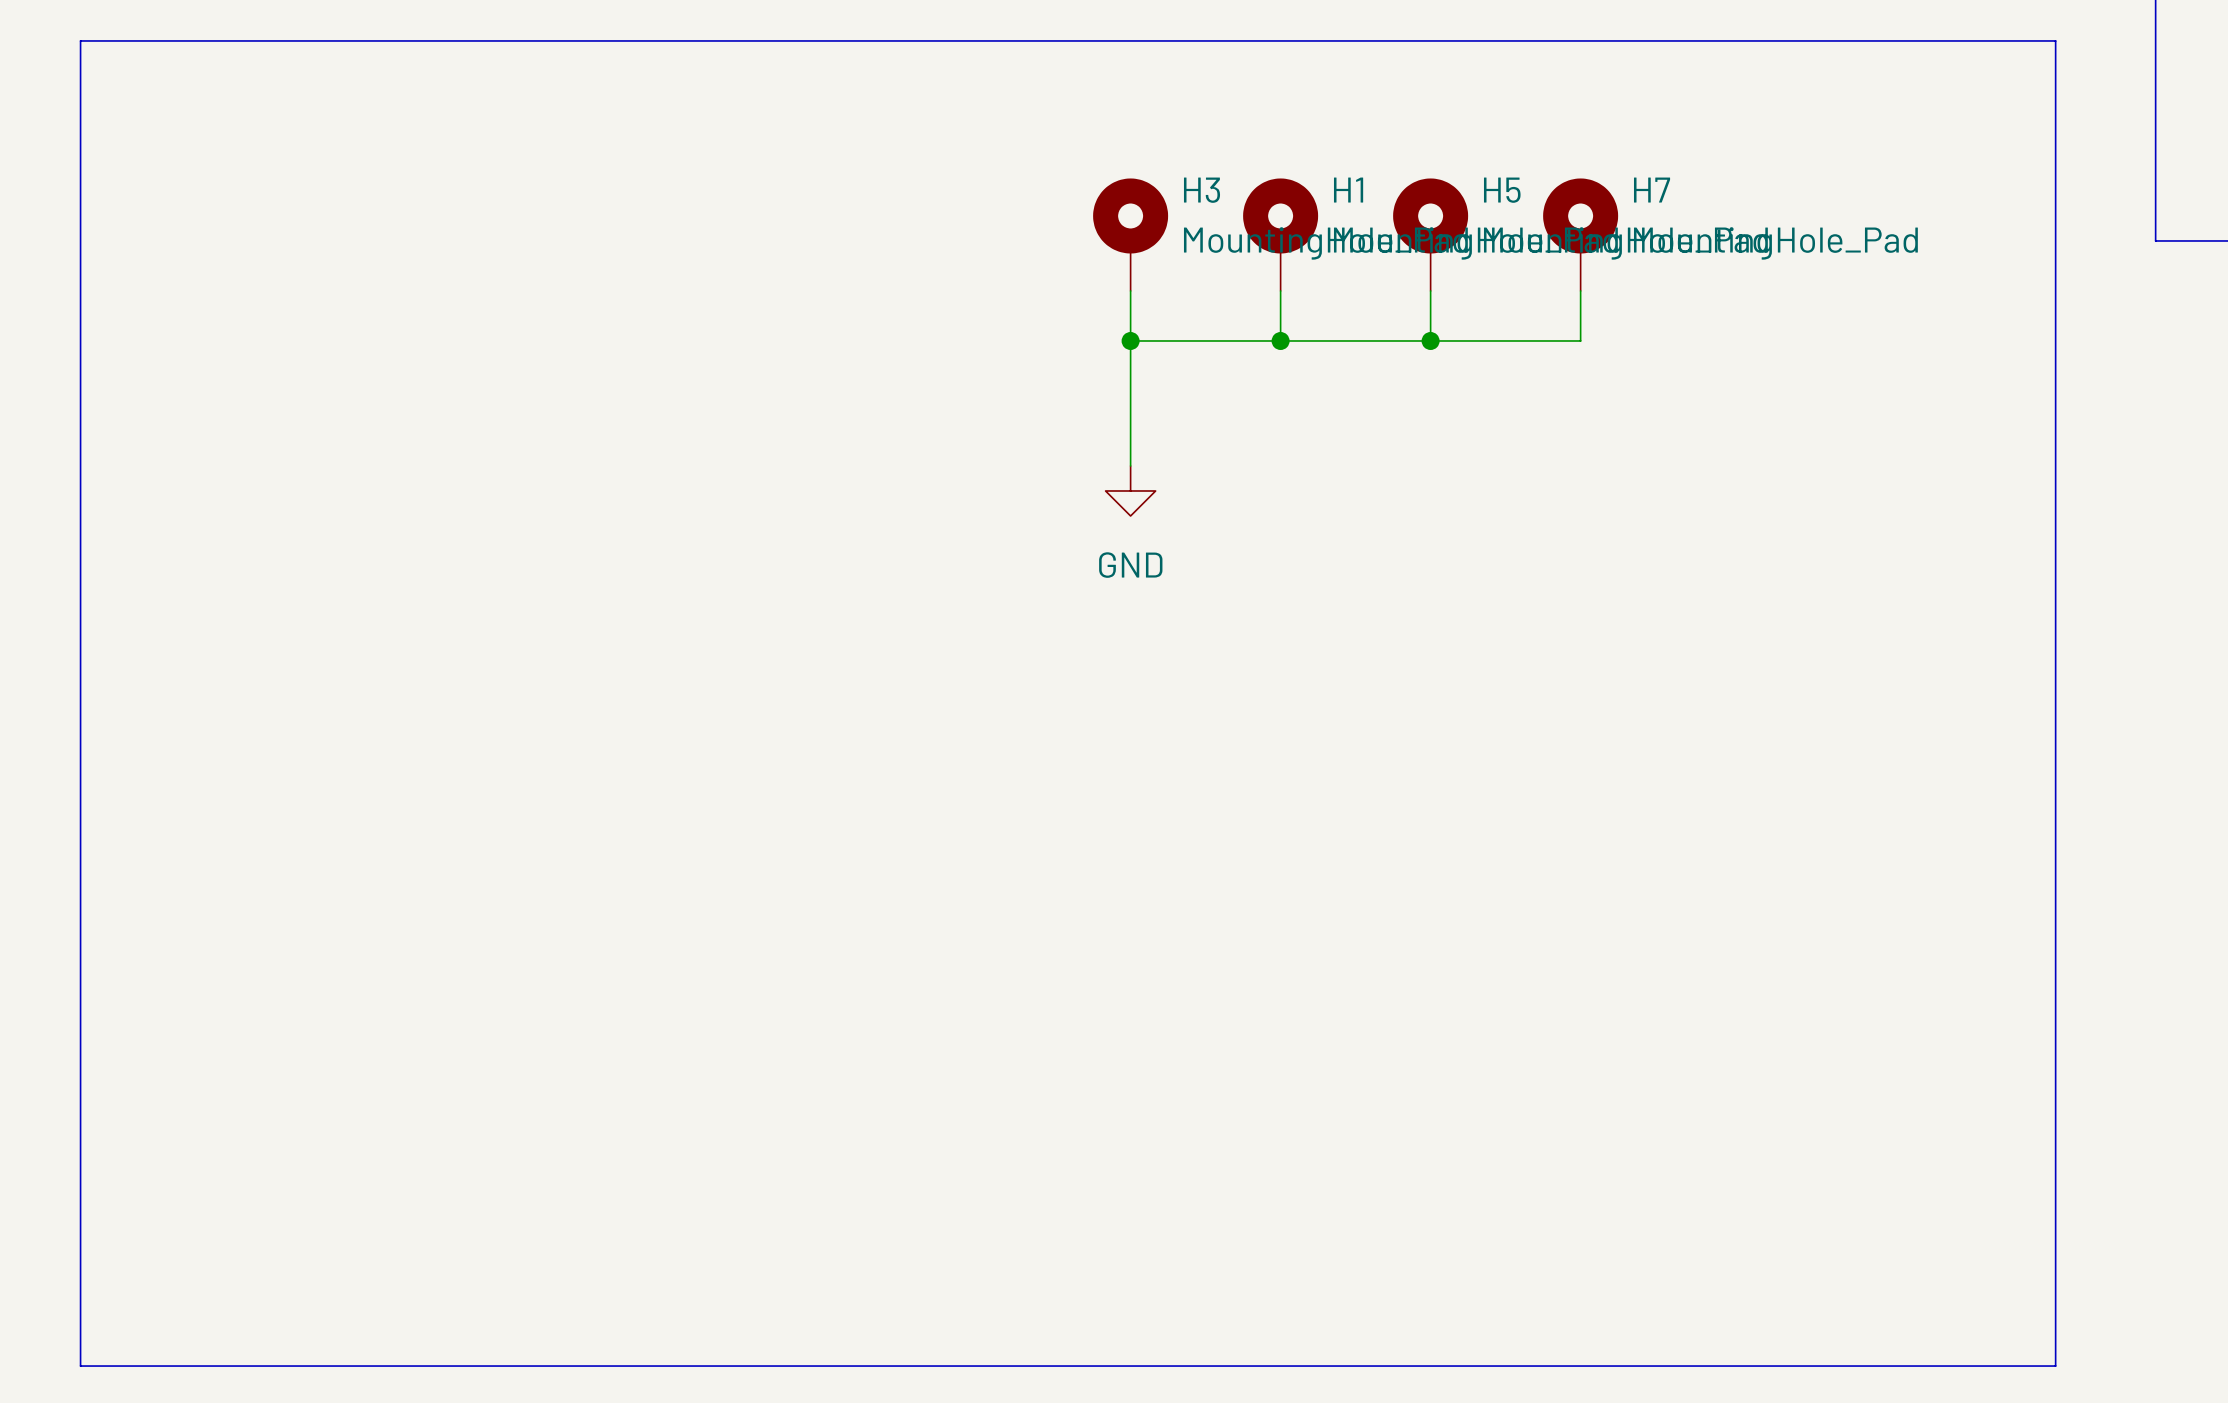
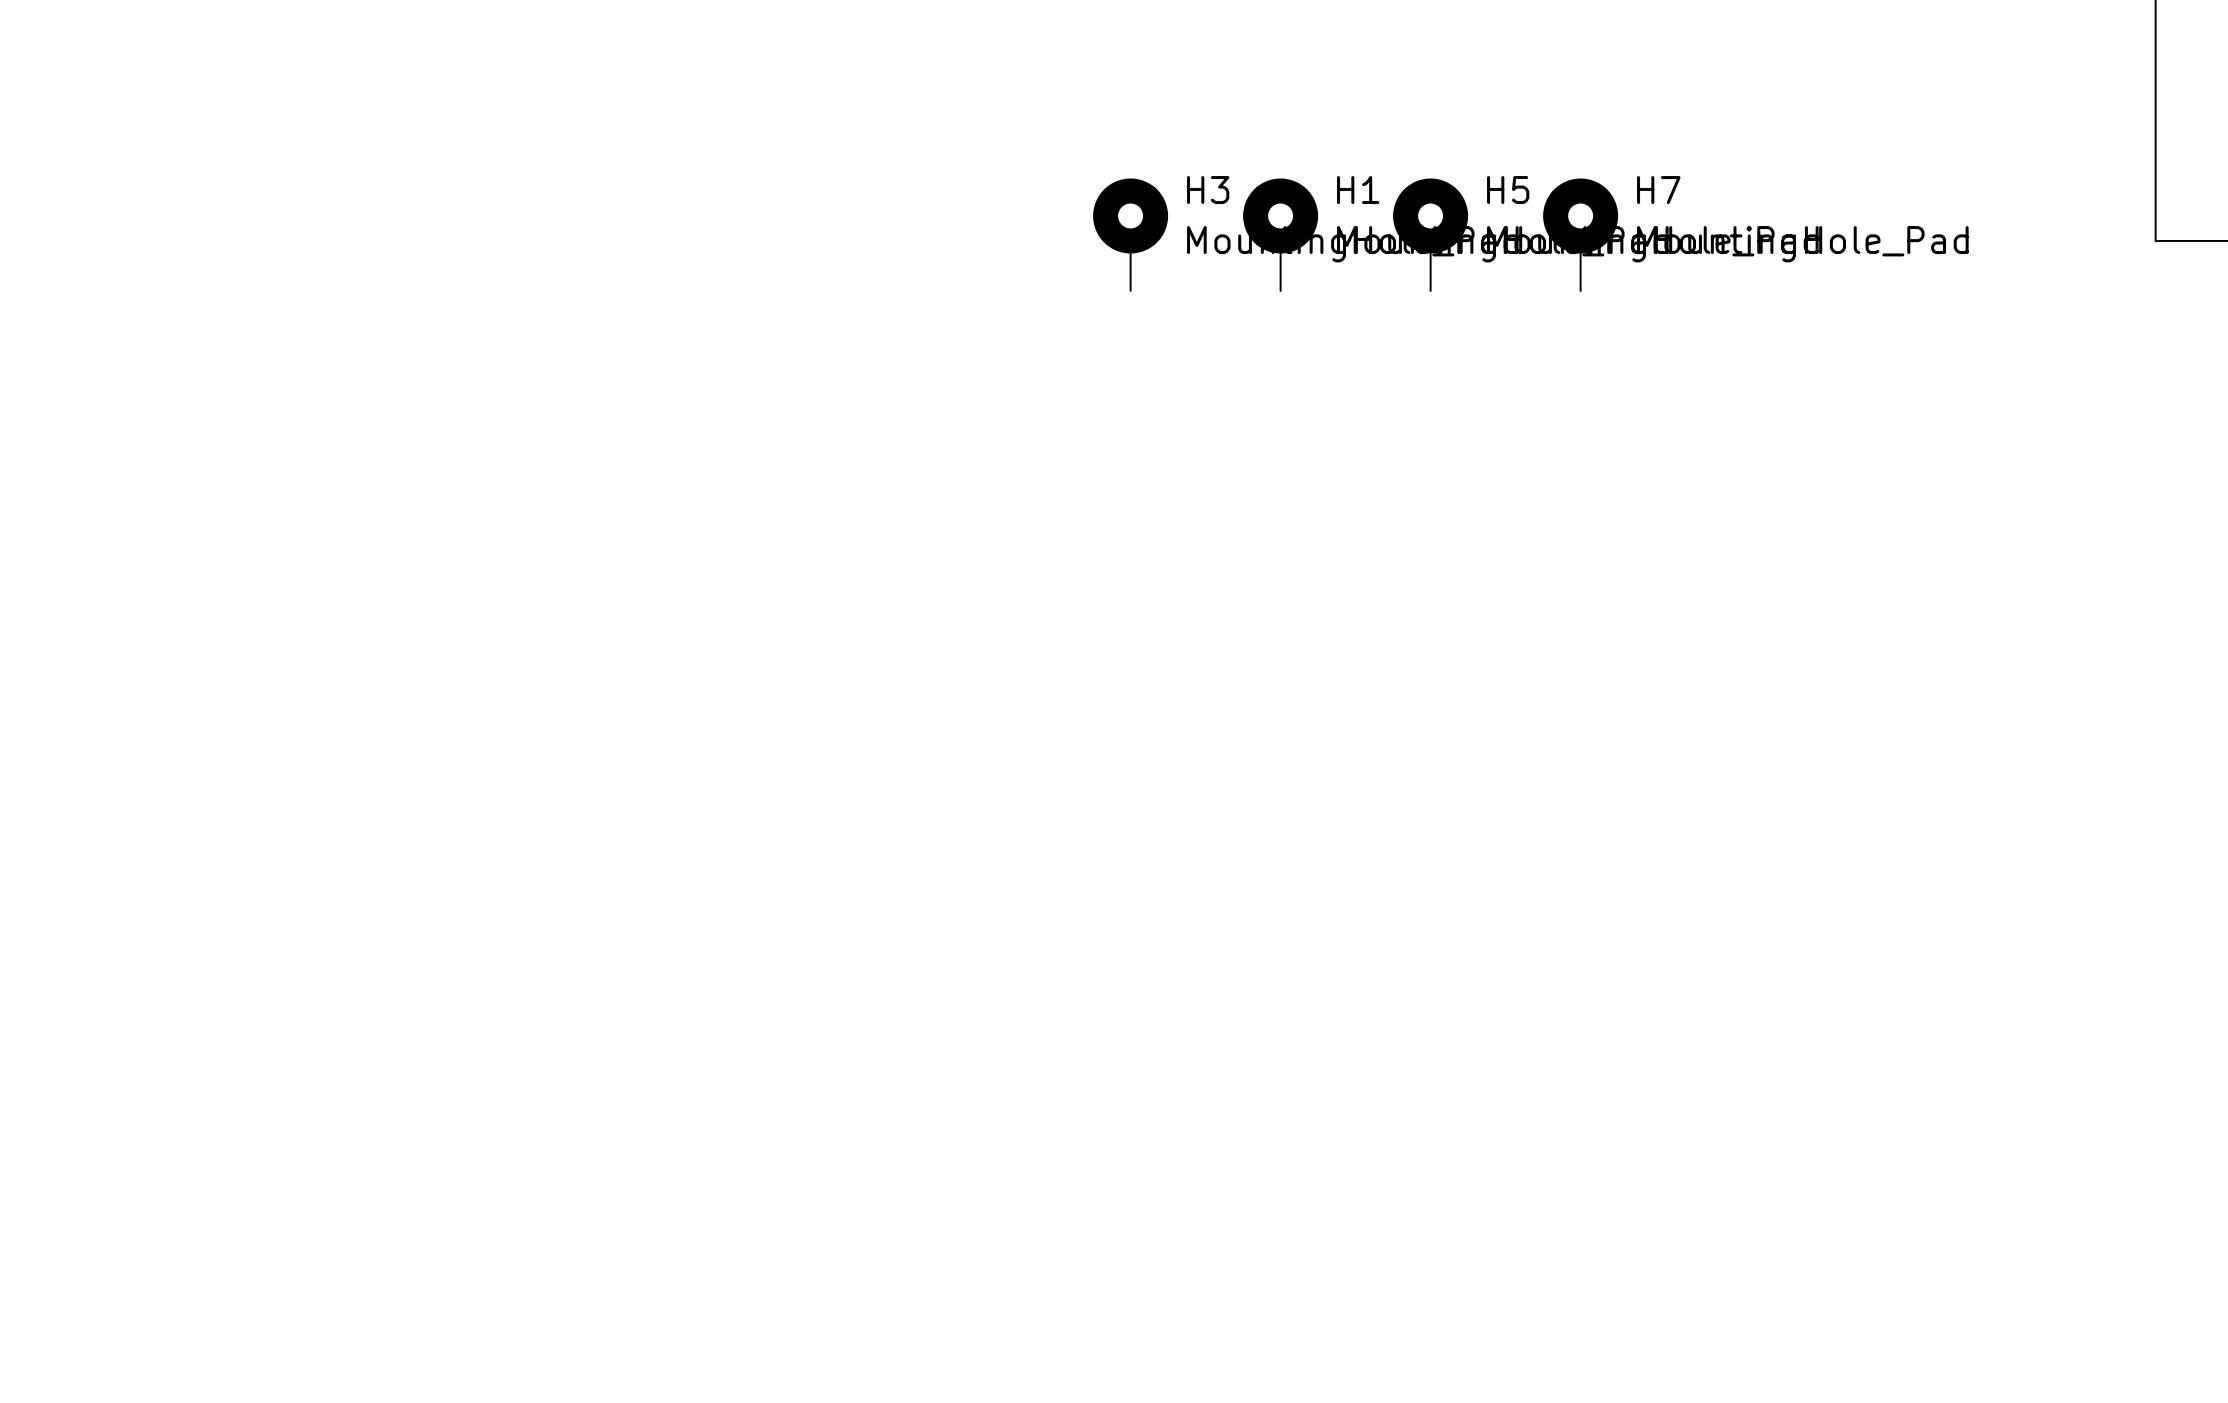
line: (80, 40) (2055, 40) (2055, 1366) (80, 1366) (80, 40) -> none
wire: (1130, 290) (1130, 465) -> none
wire: (1280, 290) (1280, 340) -> none
wire: (1430, 290) (1430, 340) -> none
wire: (1580, 290) (1580, 340) (1130, 340) -> none
junction: (1130, 340) -> none
junction: (1280, 340) -> none
junction: (1430, 340) -> none
power symbol: GND (1130, 490) -> none

